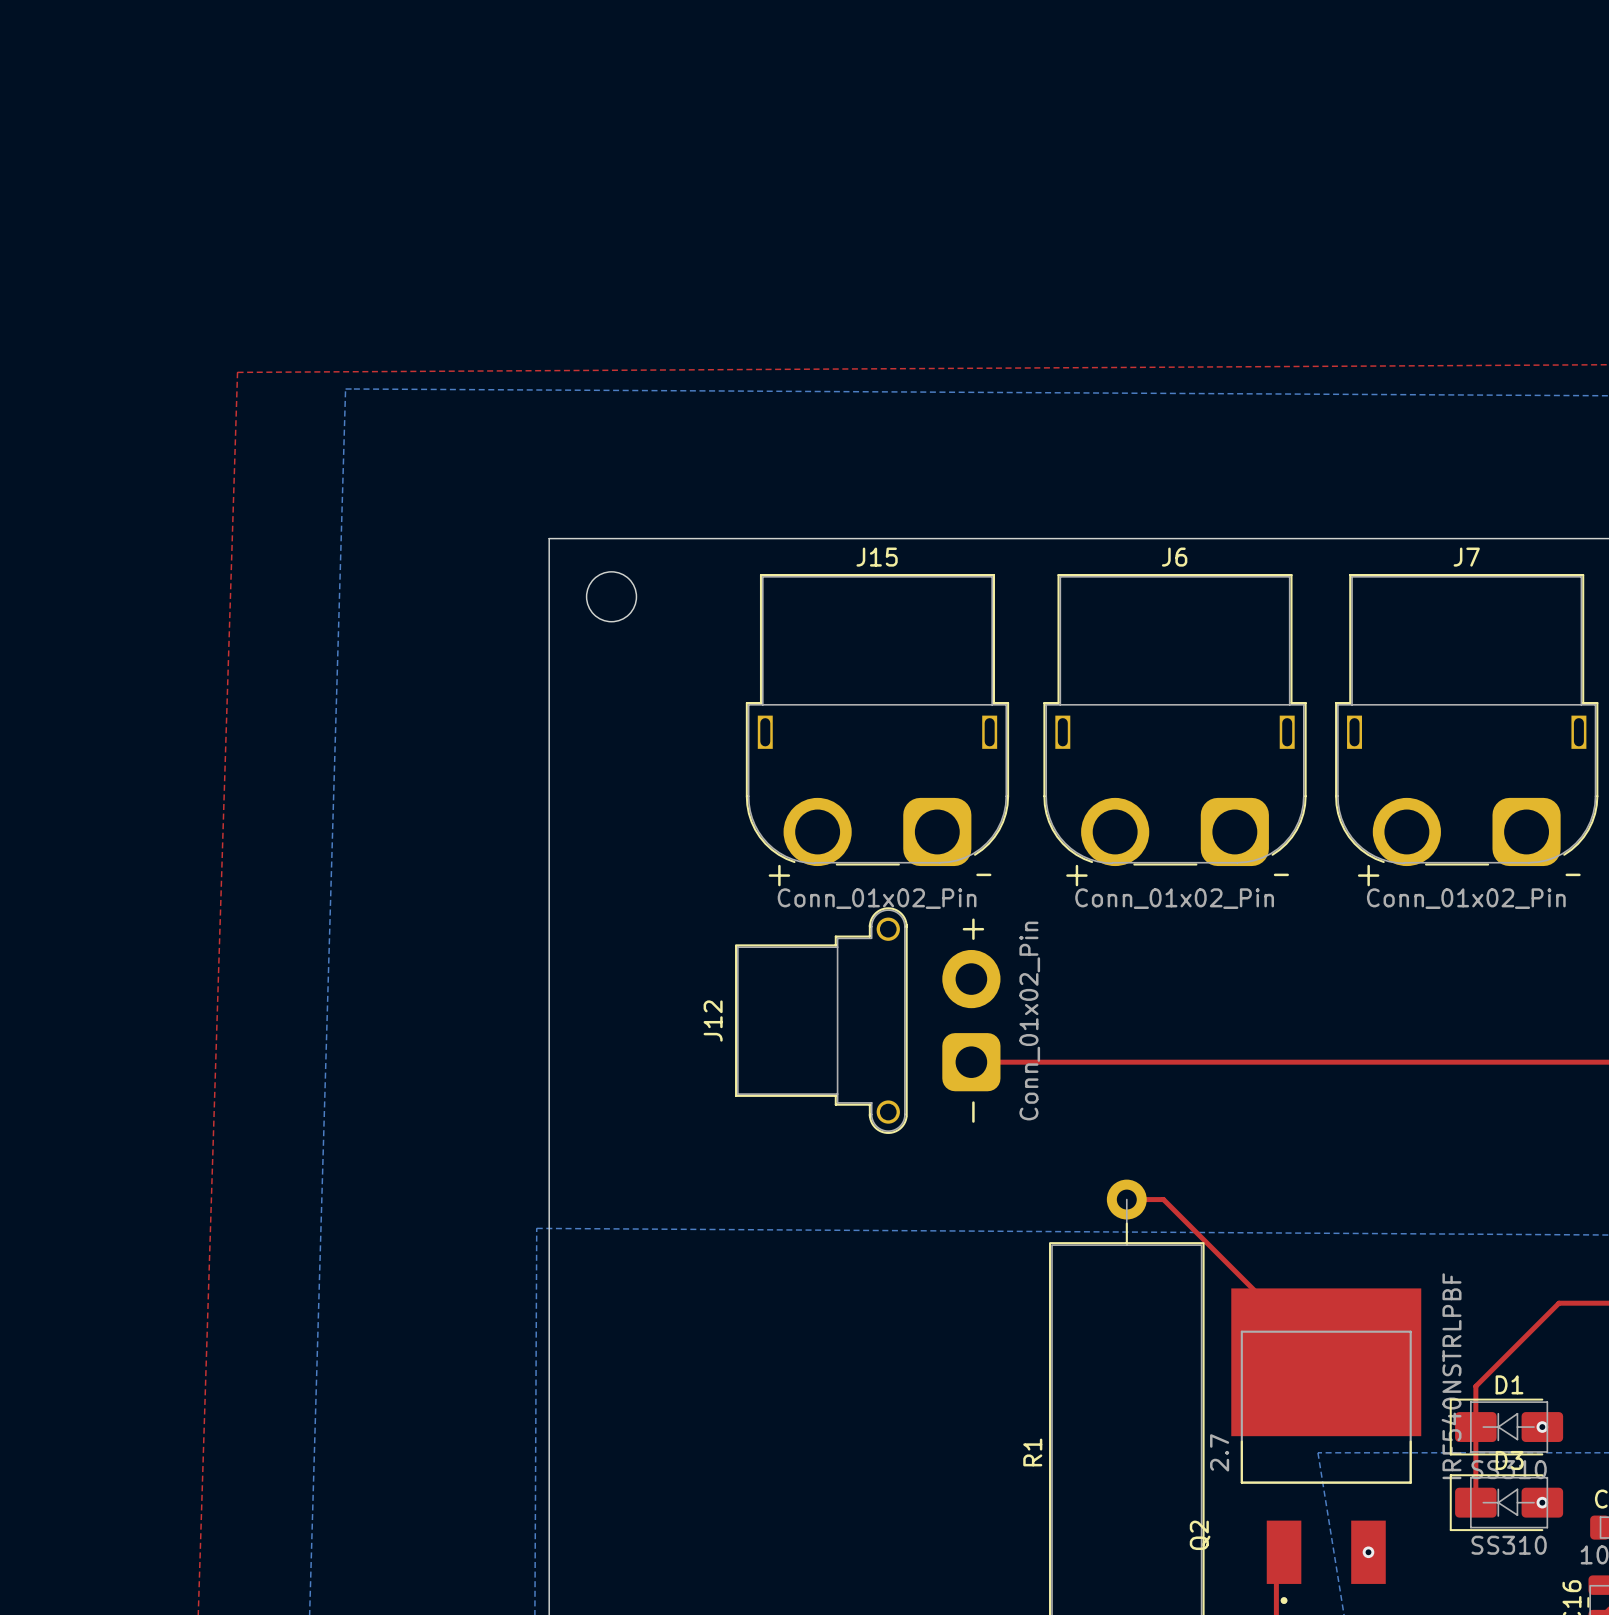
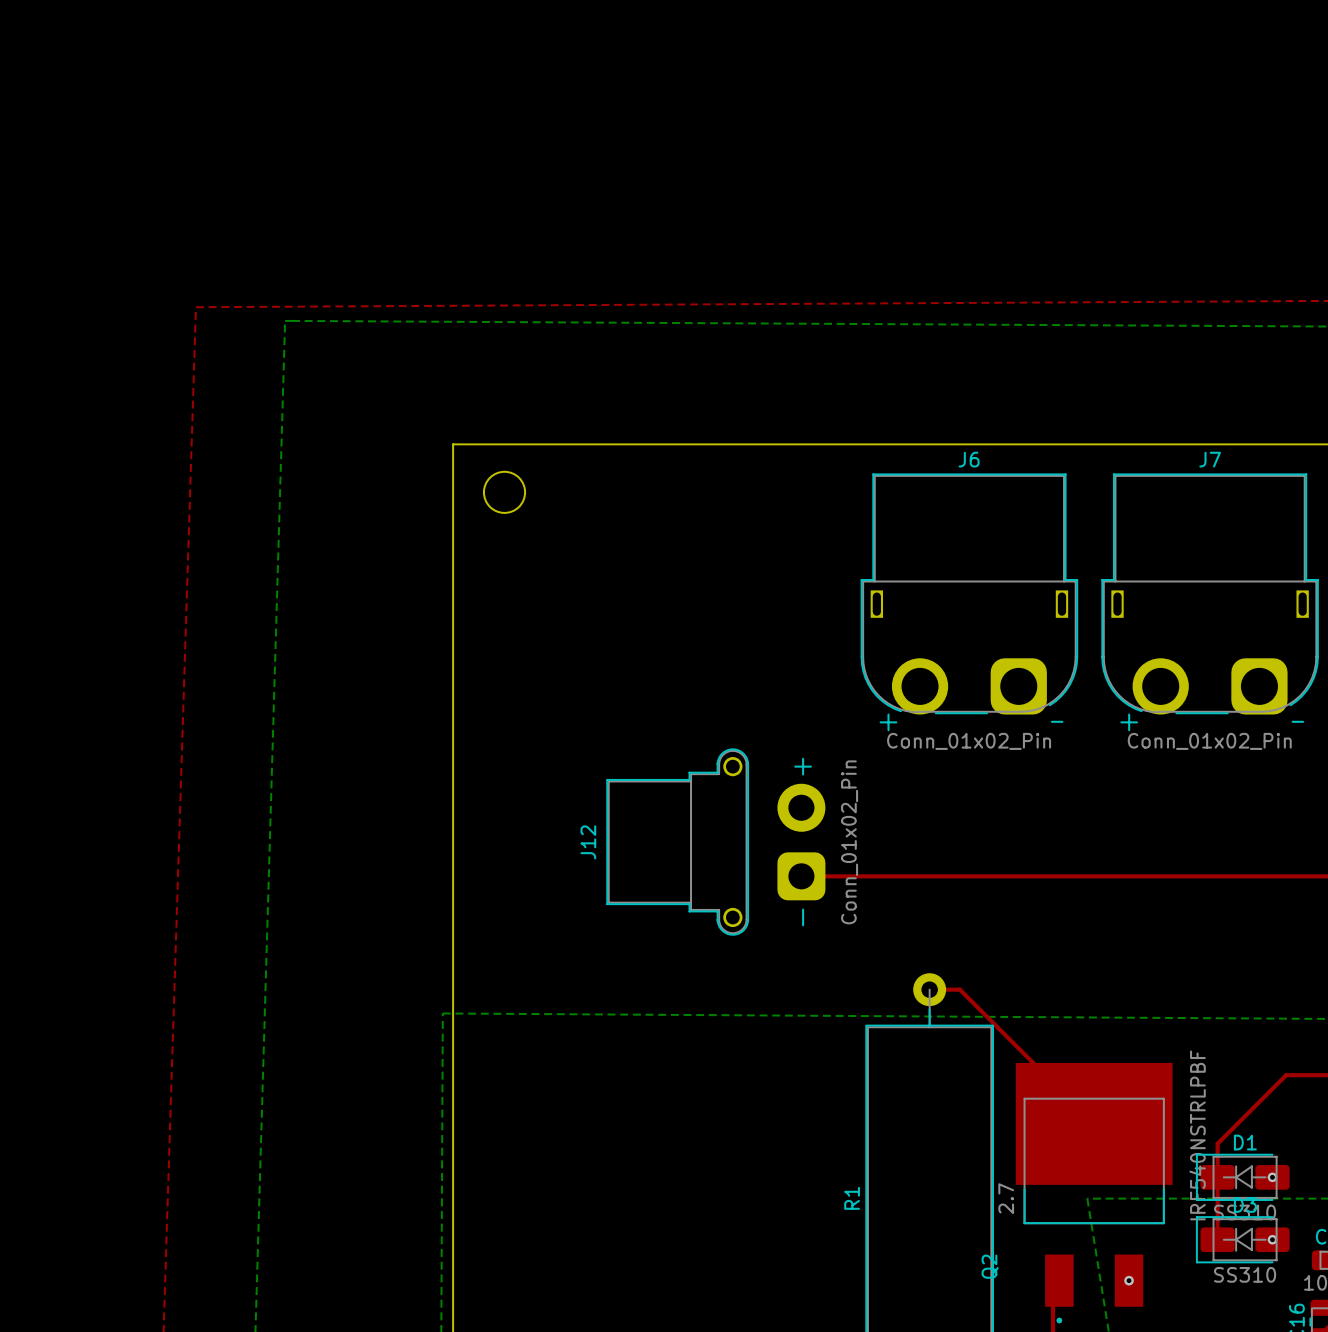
J15: Conn_01x02_Pin (877, 720) -> none

